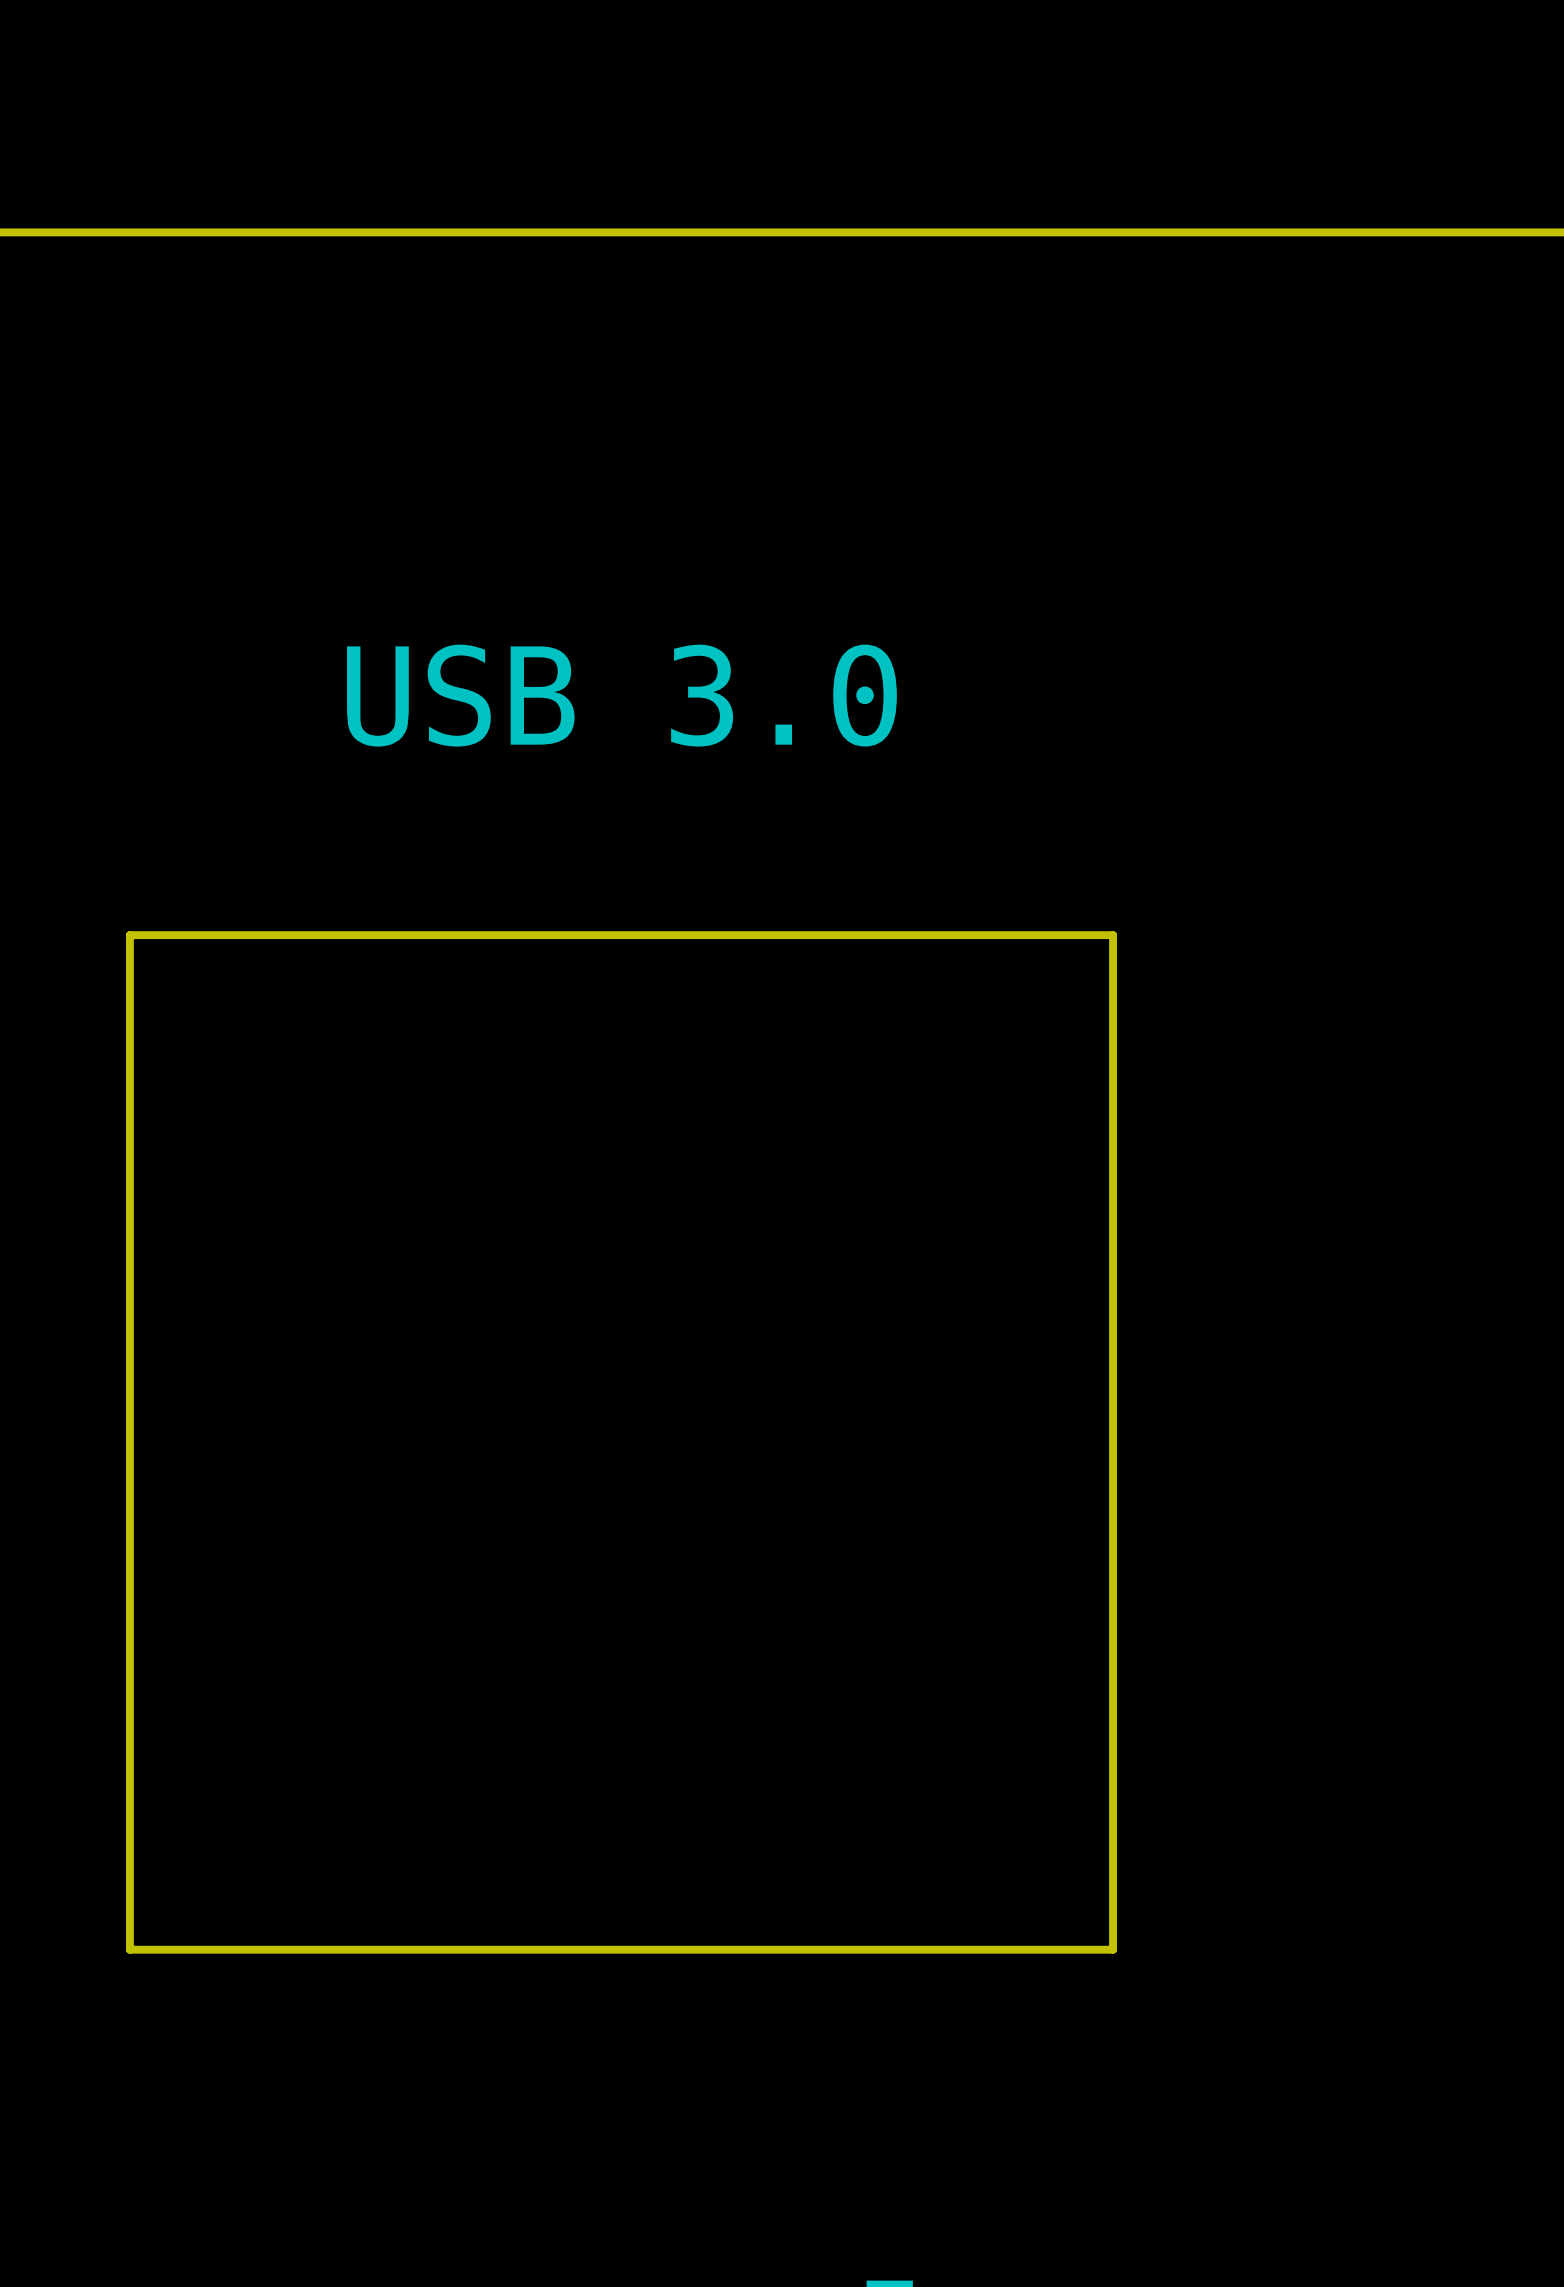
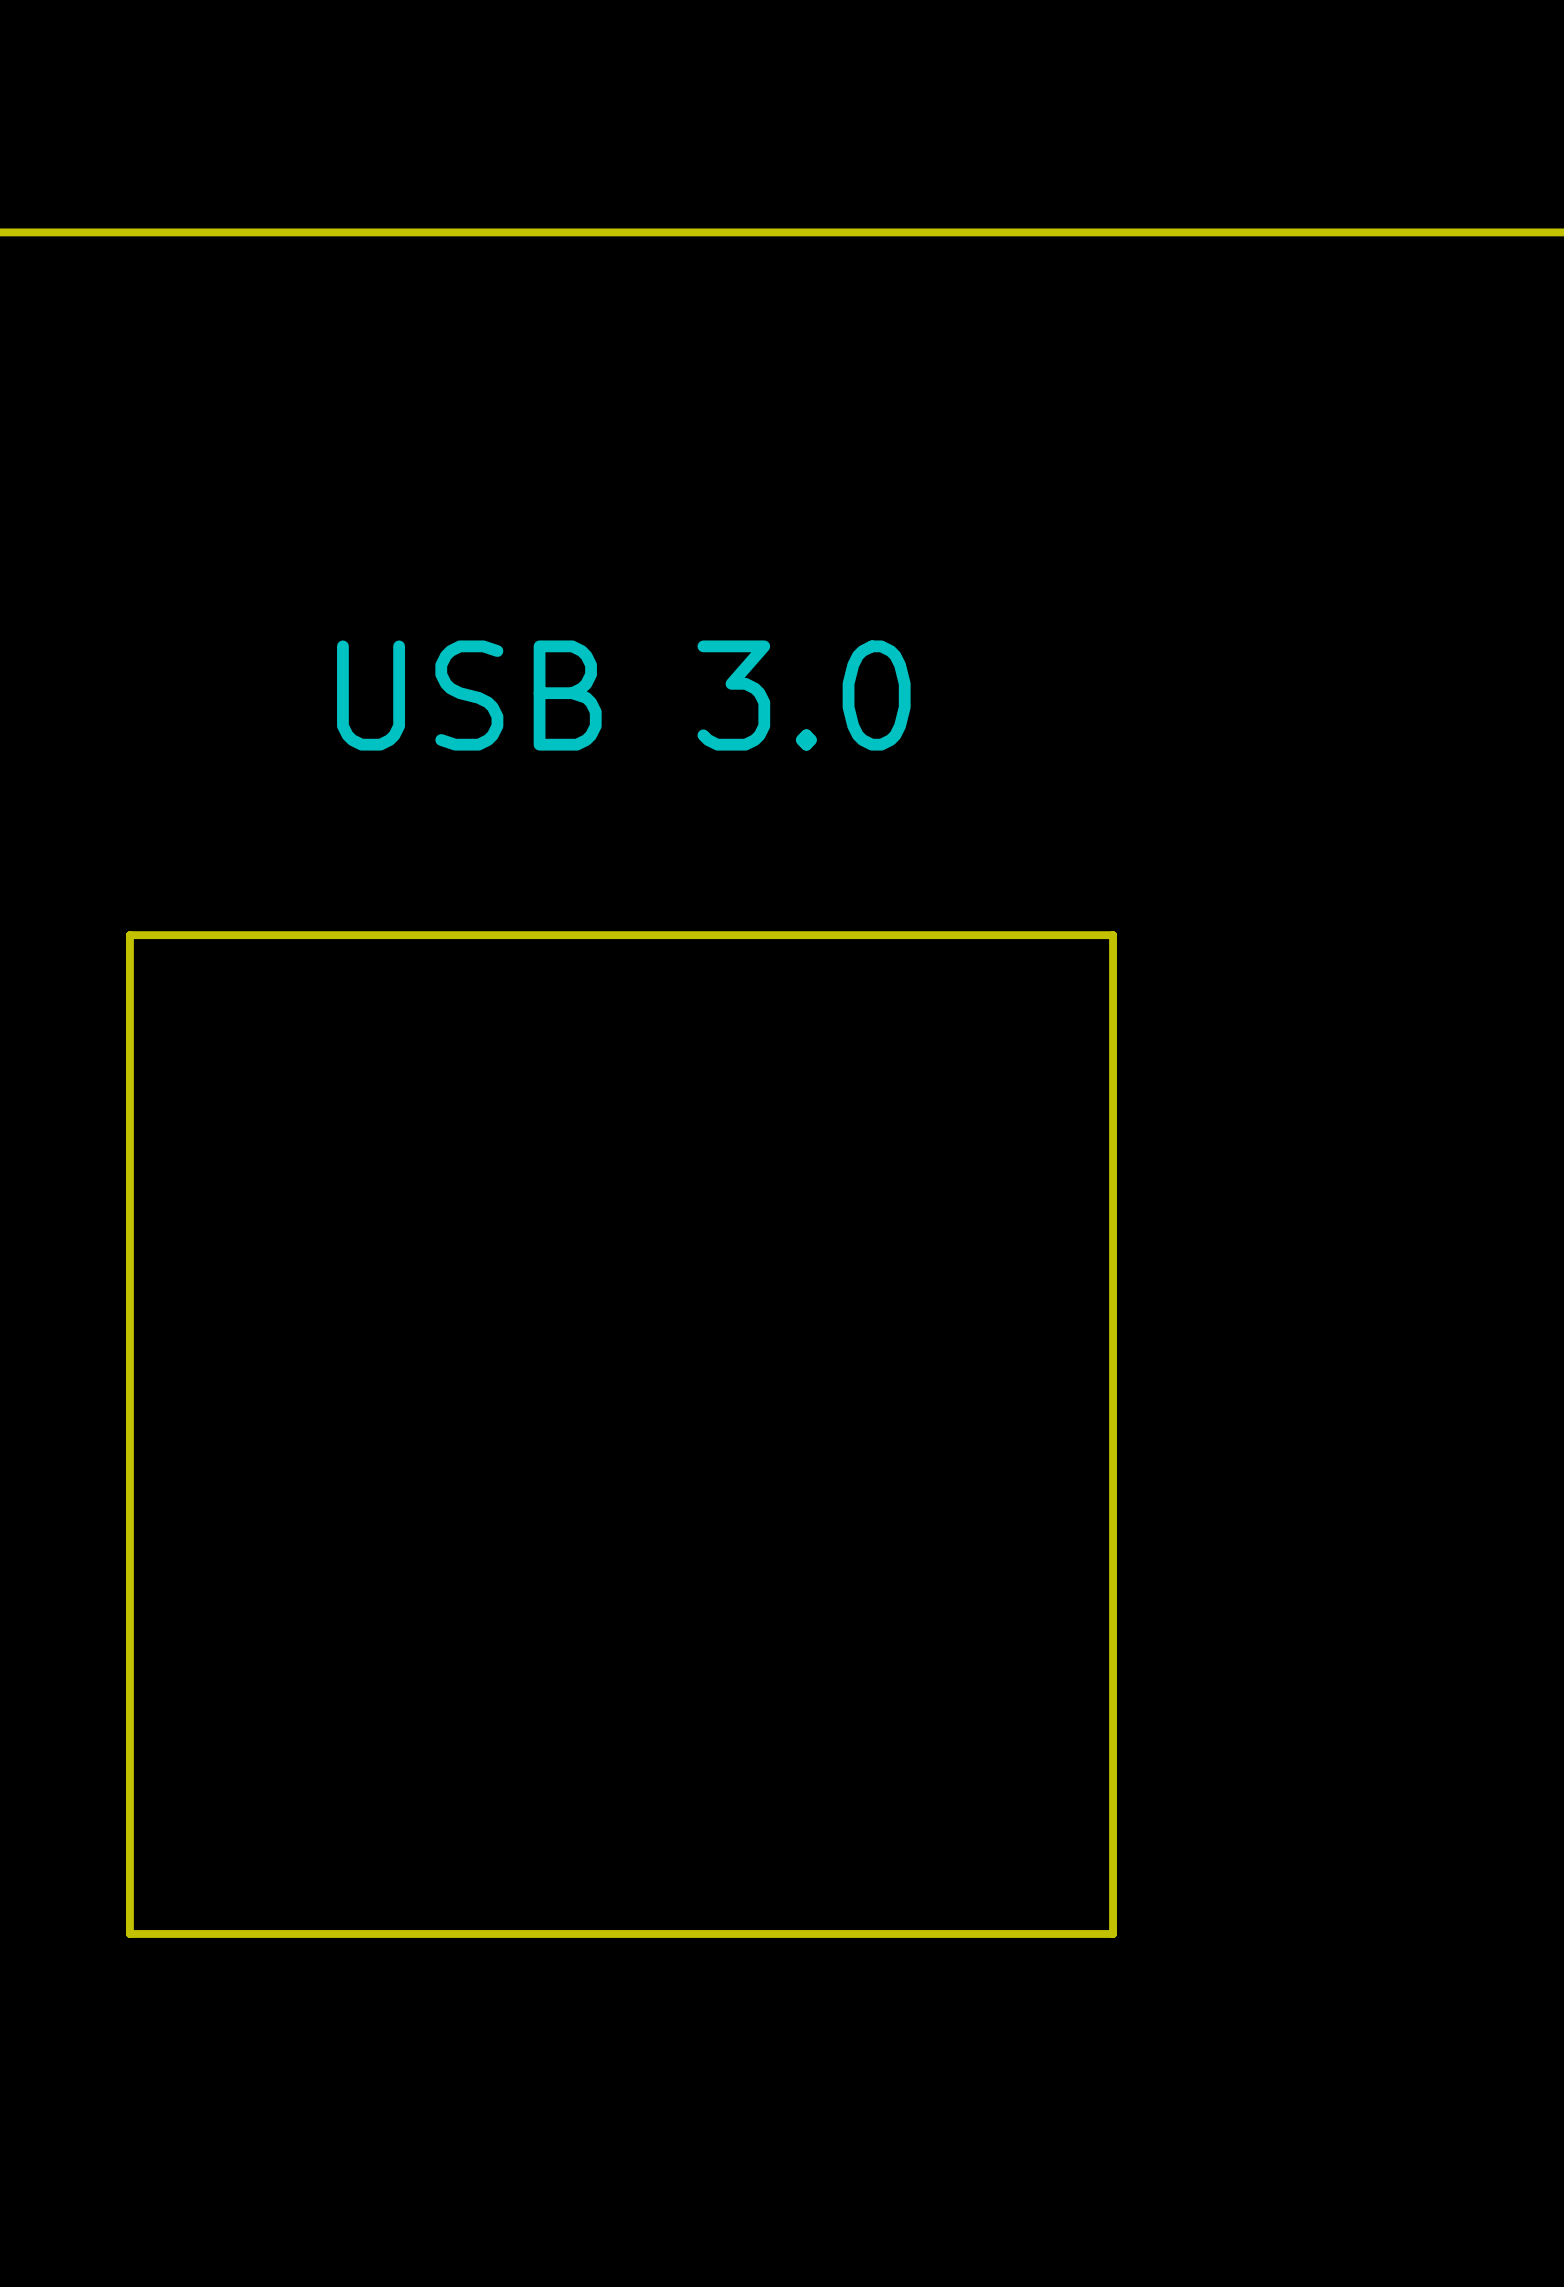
board edge: (1113, 1933) (1113, 1949) (129, 1949) (129, 1933) -> (1113, 1933) (129, 1933)

